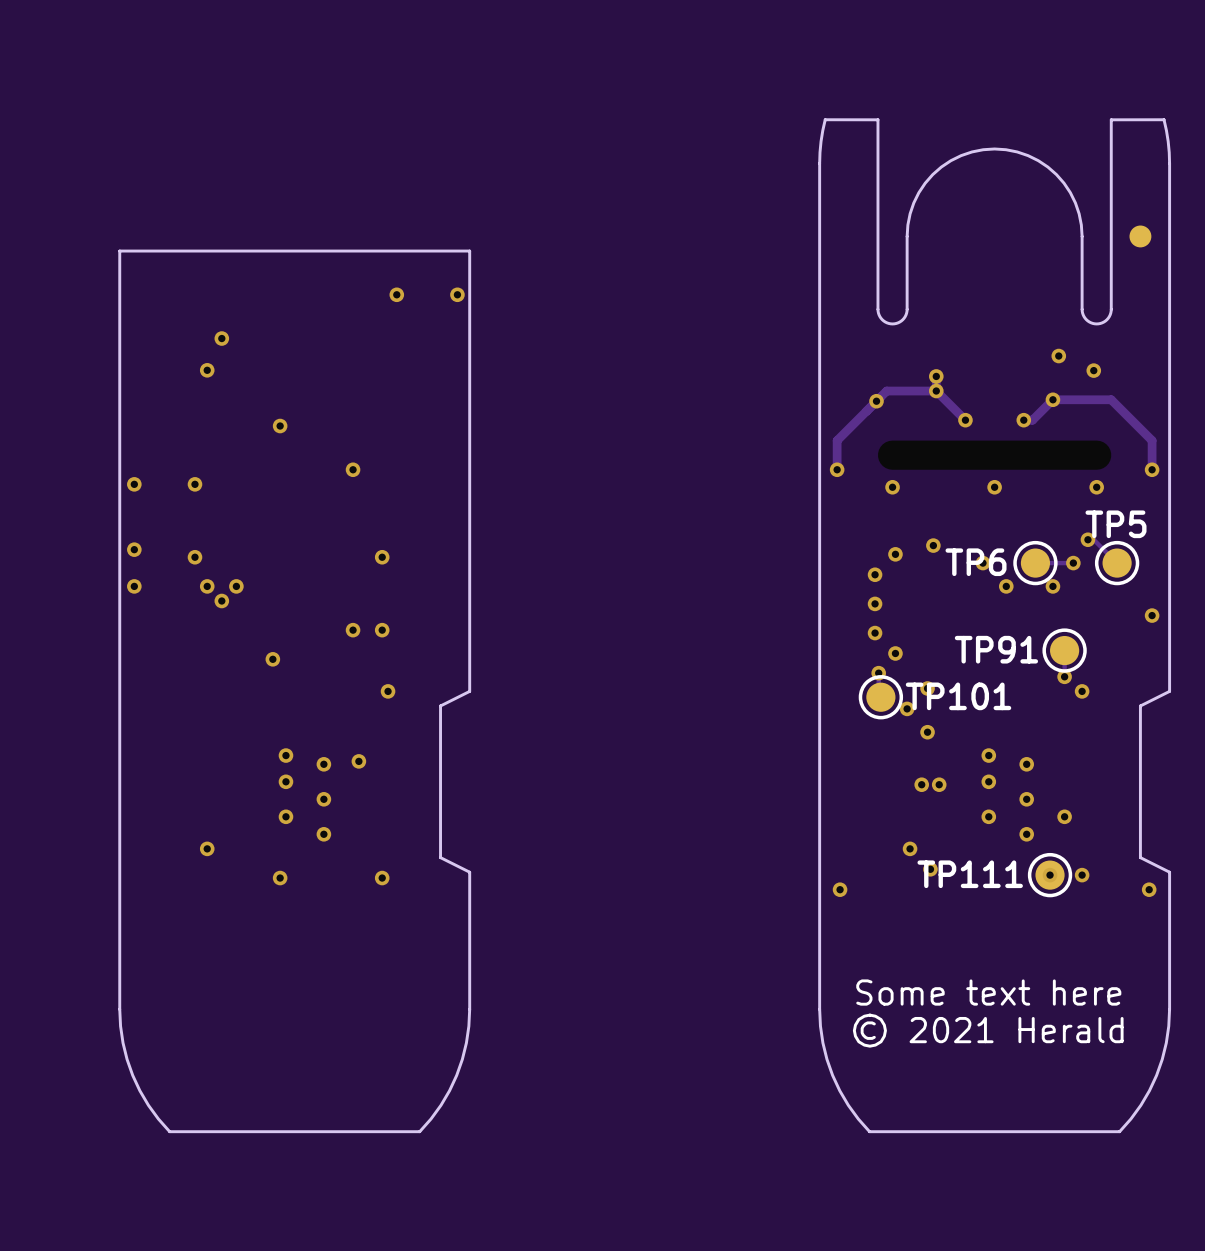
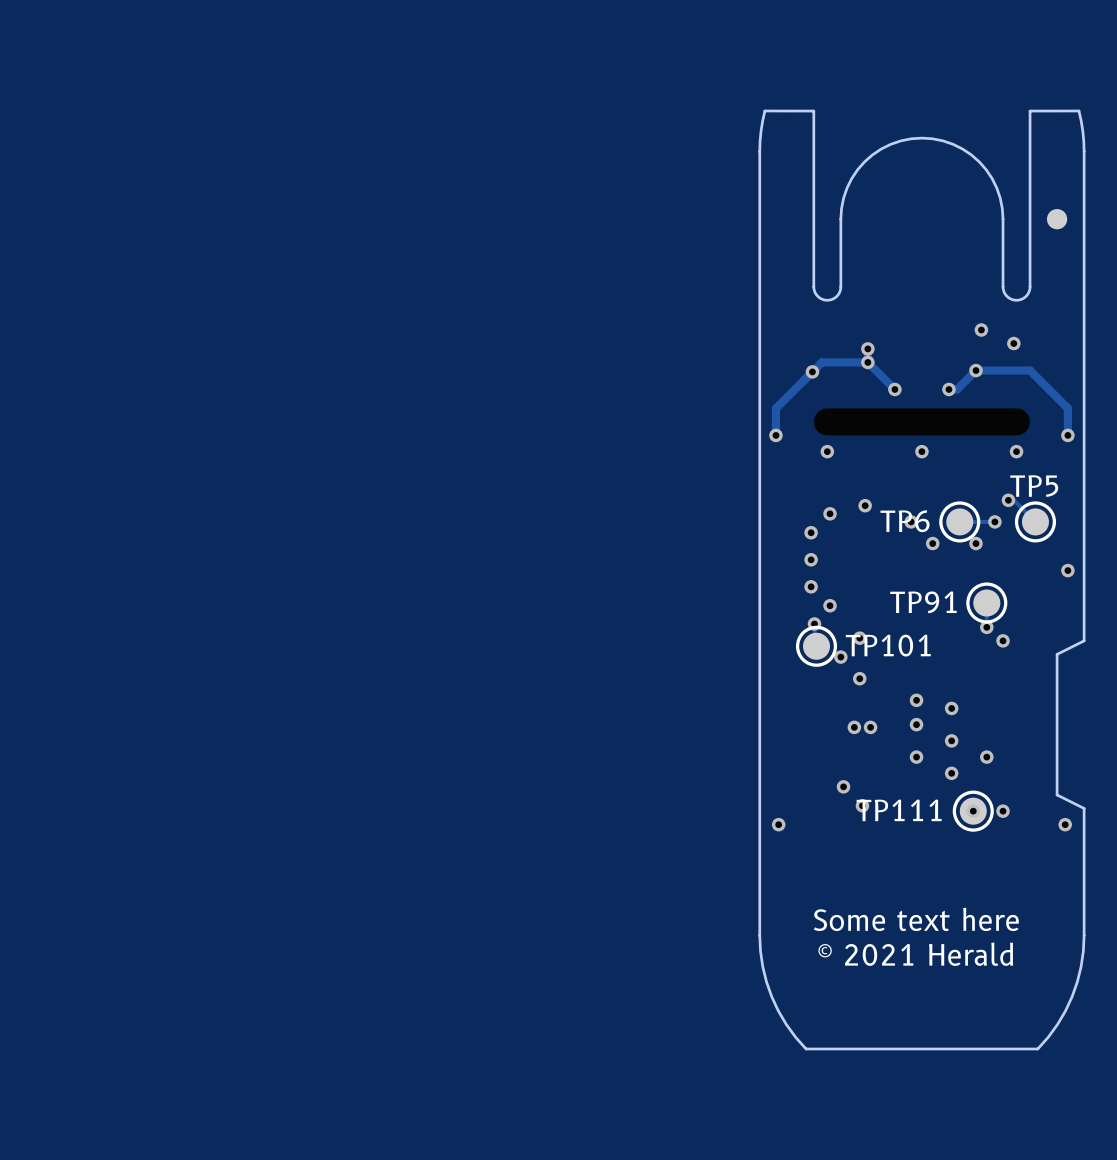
board edge: (469, 251) (469, 691) (440, 705) (440, 857) (469, 872) (469, 1009) (468, 1026) (462, 1059) (449, 1090) (440, 1105) (419, 1131) (169, 1131) (148, 1105) (139, 1090) (127, 1059) (120, 1026) (119, 251) (469, 251) -> none
via: (396, 294) -> none
via: (457, 294) -> none
via: (221, 338) -> none
via: (207, 370) -> none
via: (280, 426) -> none
via: (353, 469) -> none
via: (134, 484) -> none
via: (194, 484) -> none
via: (134, 549) -> none
via: (194, 557) -> none
via: (382, 557) -> none
via: (134, 586) -> none
via: (207, 586) -> none
via: (236, 586) -> none
via: (221, 600) -> none
via: (353, 630) -> none
via: (382, 630) -> none
via: (272, 659) -> none
via: (388, 691) -> none
via: (285, 755) -> none
via: (358, 761) -> none
via: (323, 764) -> none
via: (285, 781) -> none
via: (323, 799) -> none
via: (285, 816) -> none
via: (323, 834) -> none
via: (207, 848) -> none
via: (280, 878) -> none
via: (382, 878) -> none

